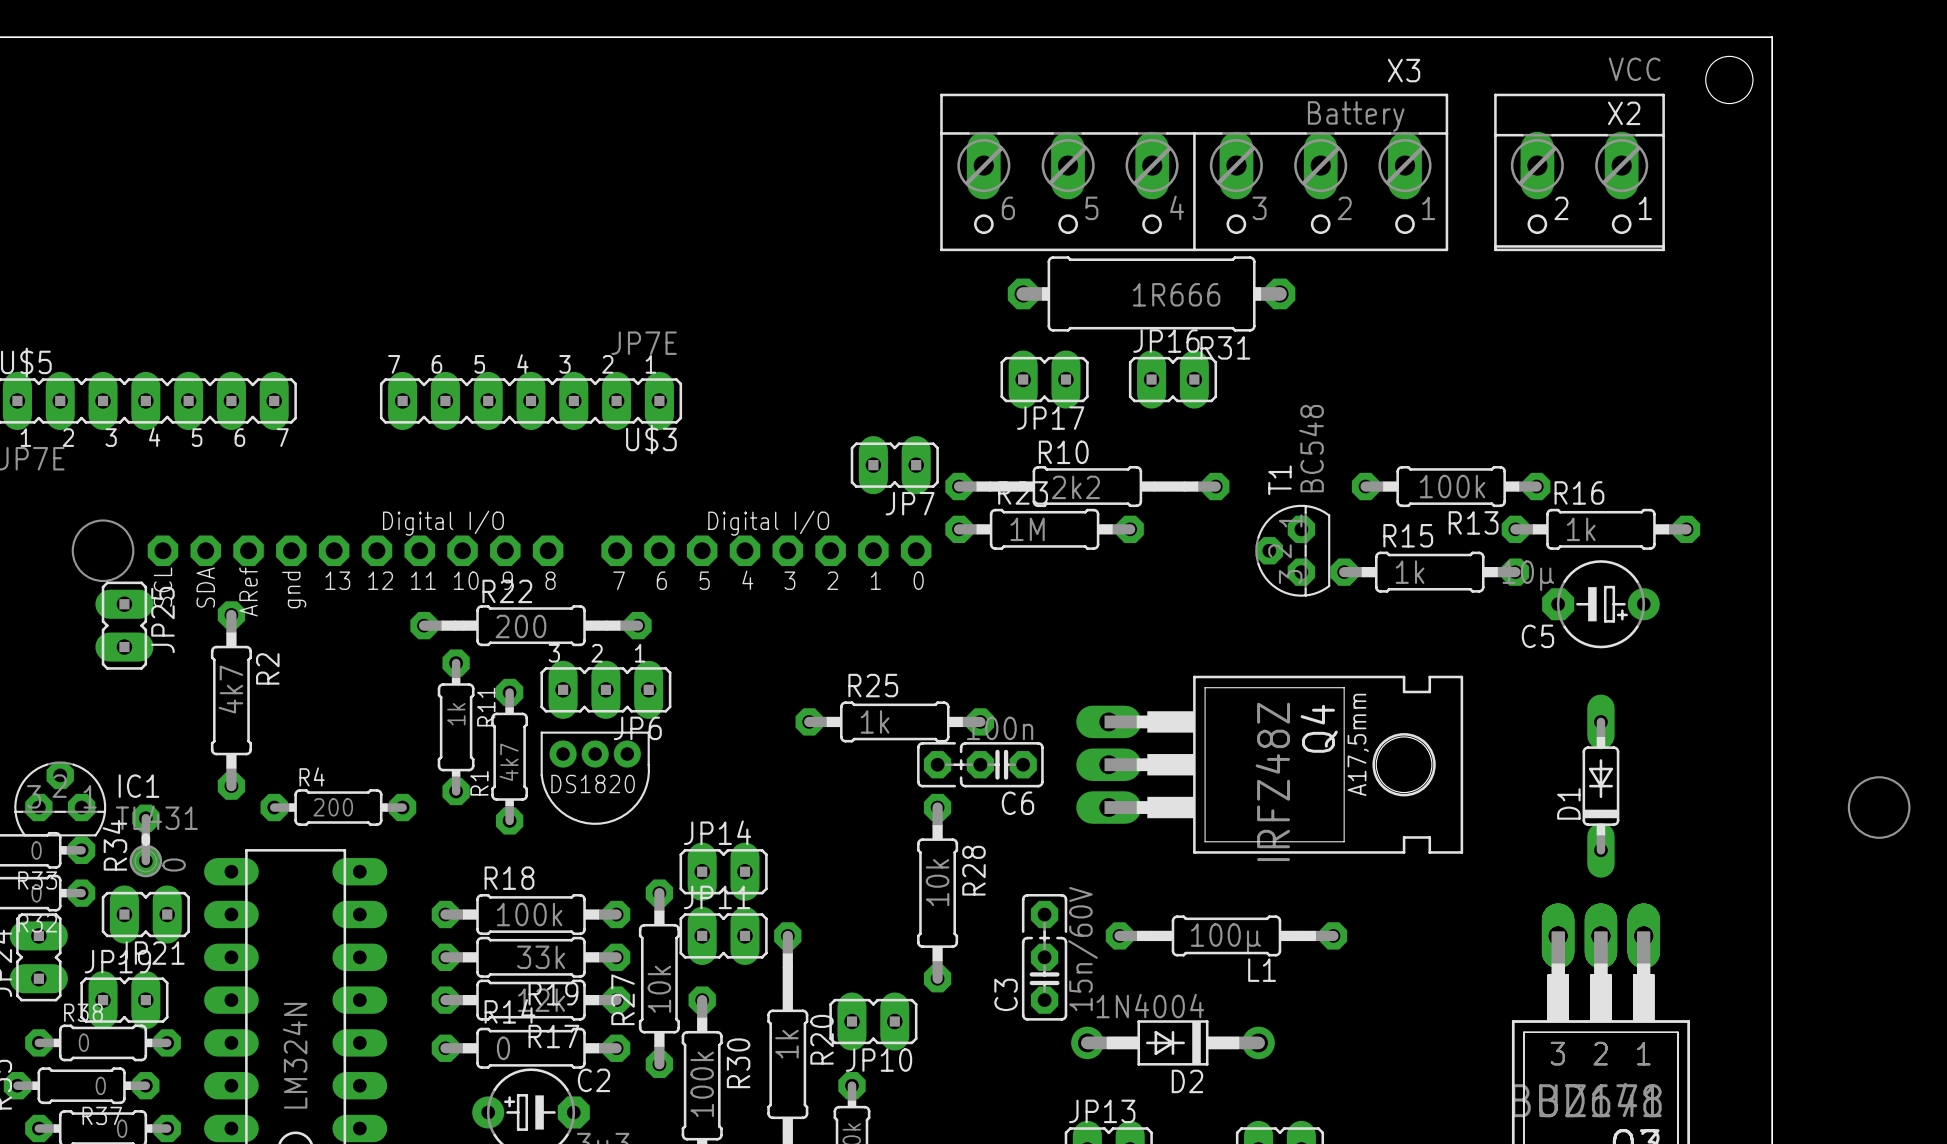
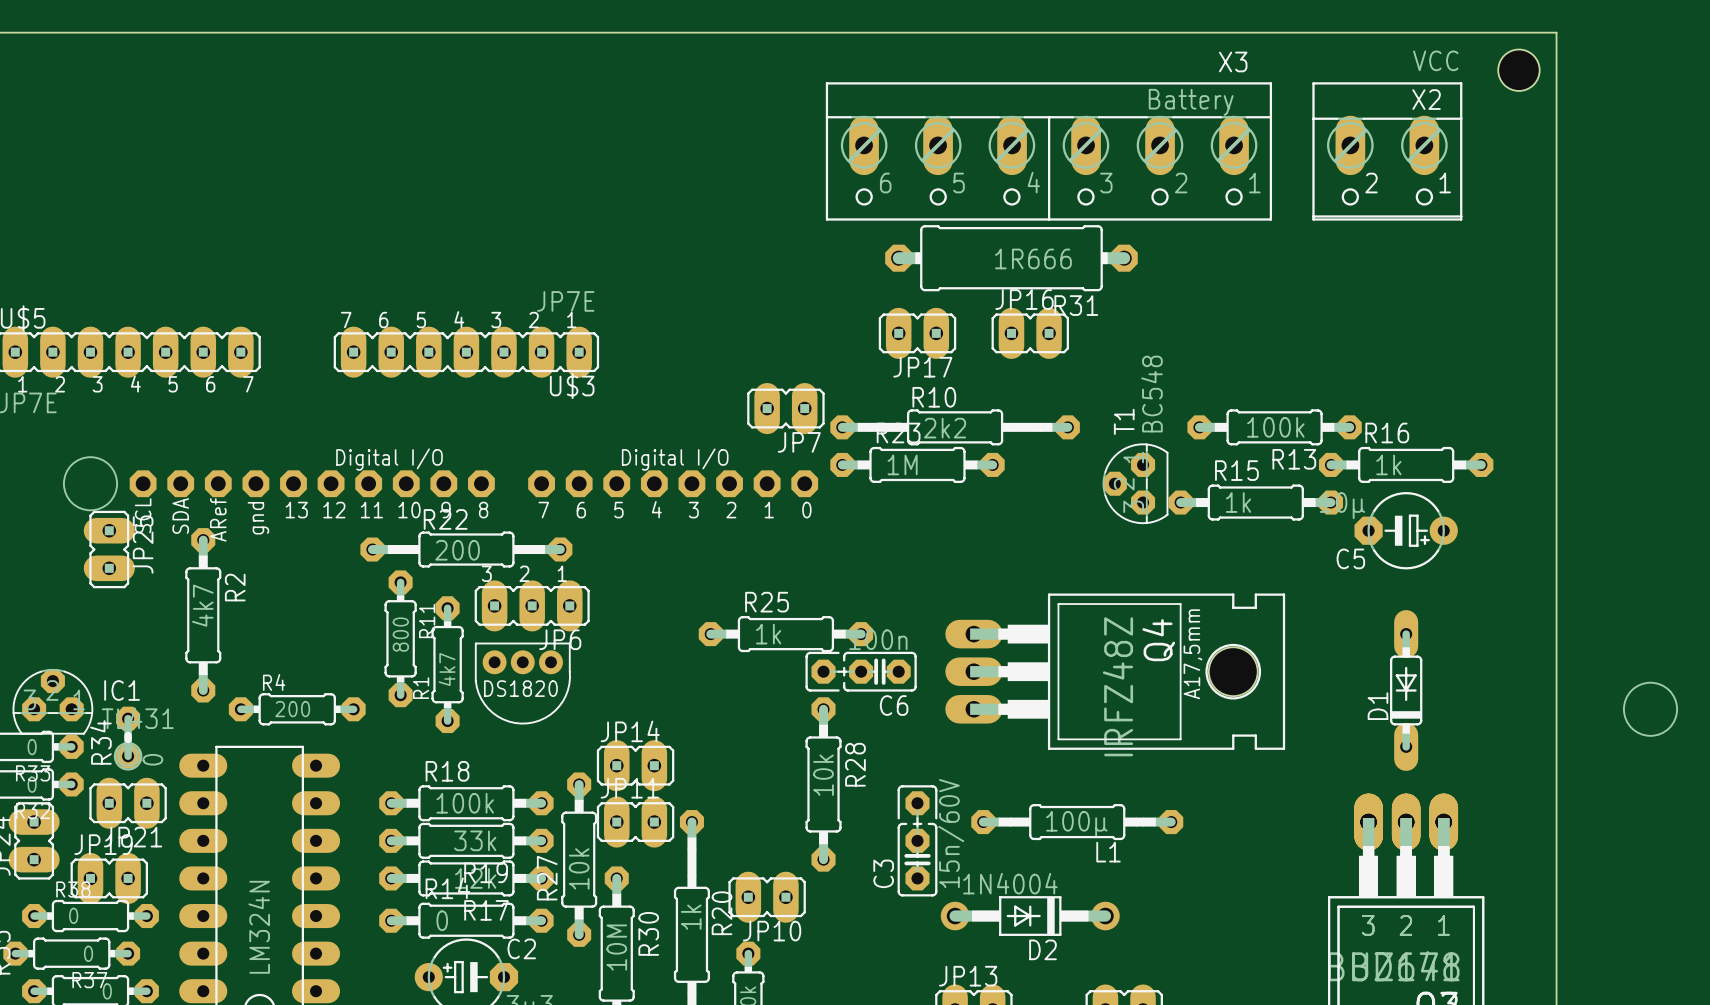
R11 value: 1k (456, 714) -> 800 (400, 634)
R30 value: 100k (702, 1084) -> 10M (616, 947)

